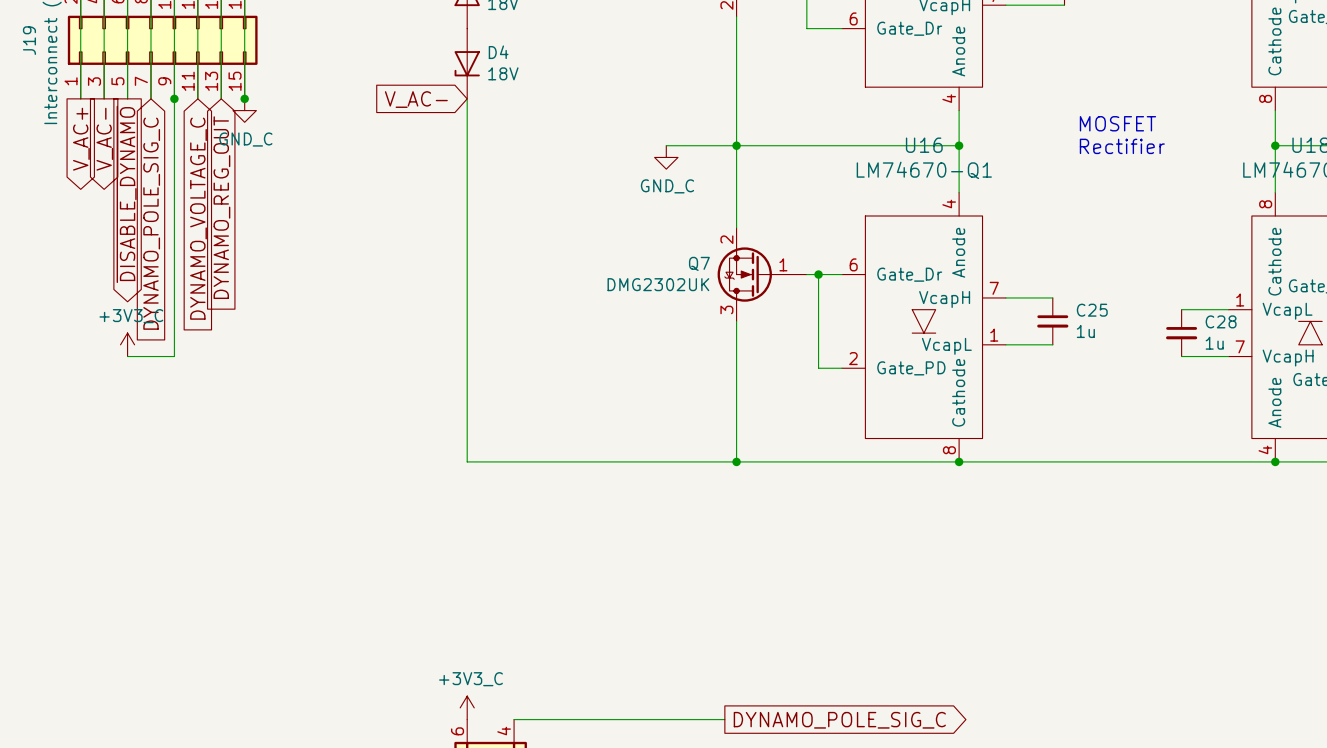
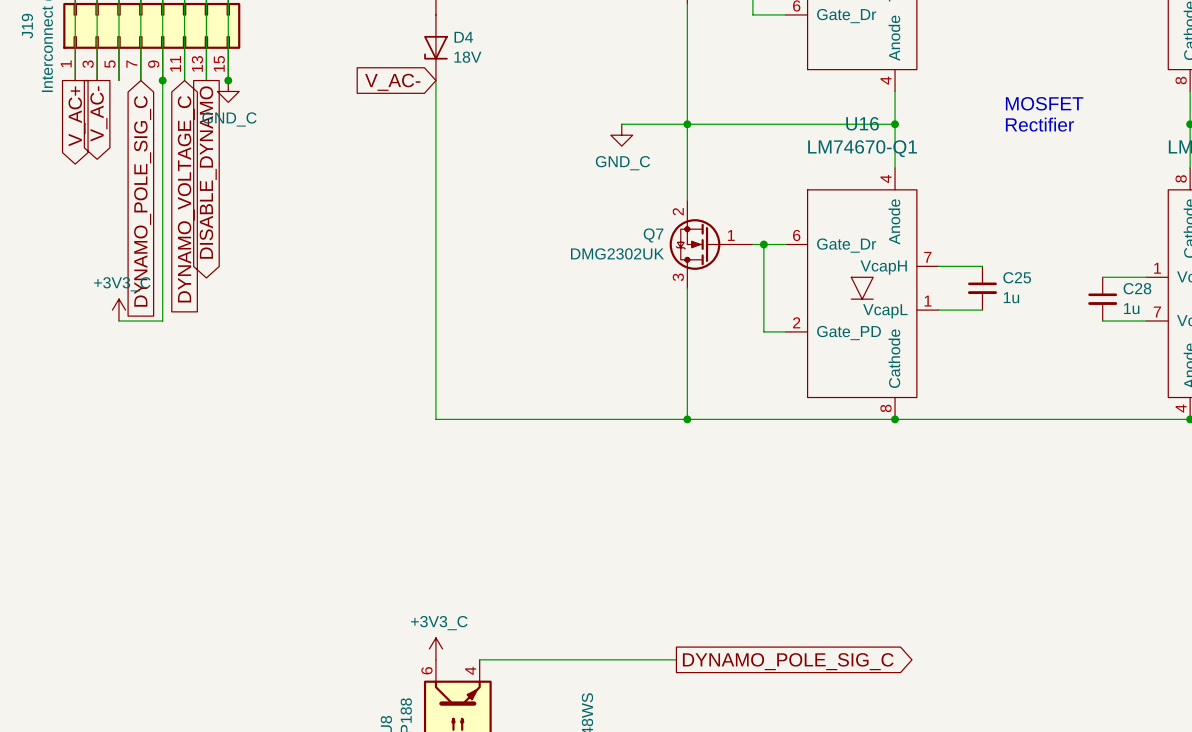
global label: ~{DISABLE_DYNAMO} (126, 194) -> none
global label shape: input (221, 207) -> output (208, 172)
global label: DYNAMO_REG_OUT (221, 207) -> DISABLE_DYNAMO (208, 172)

